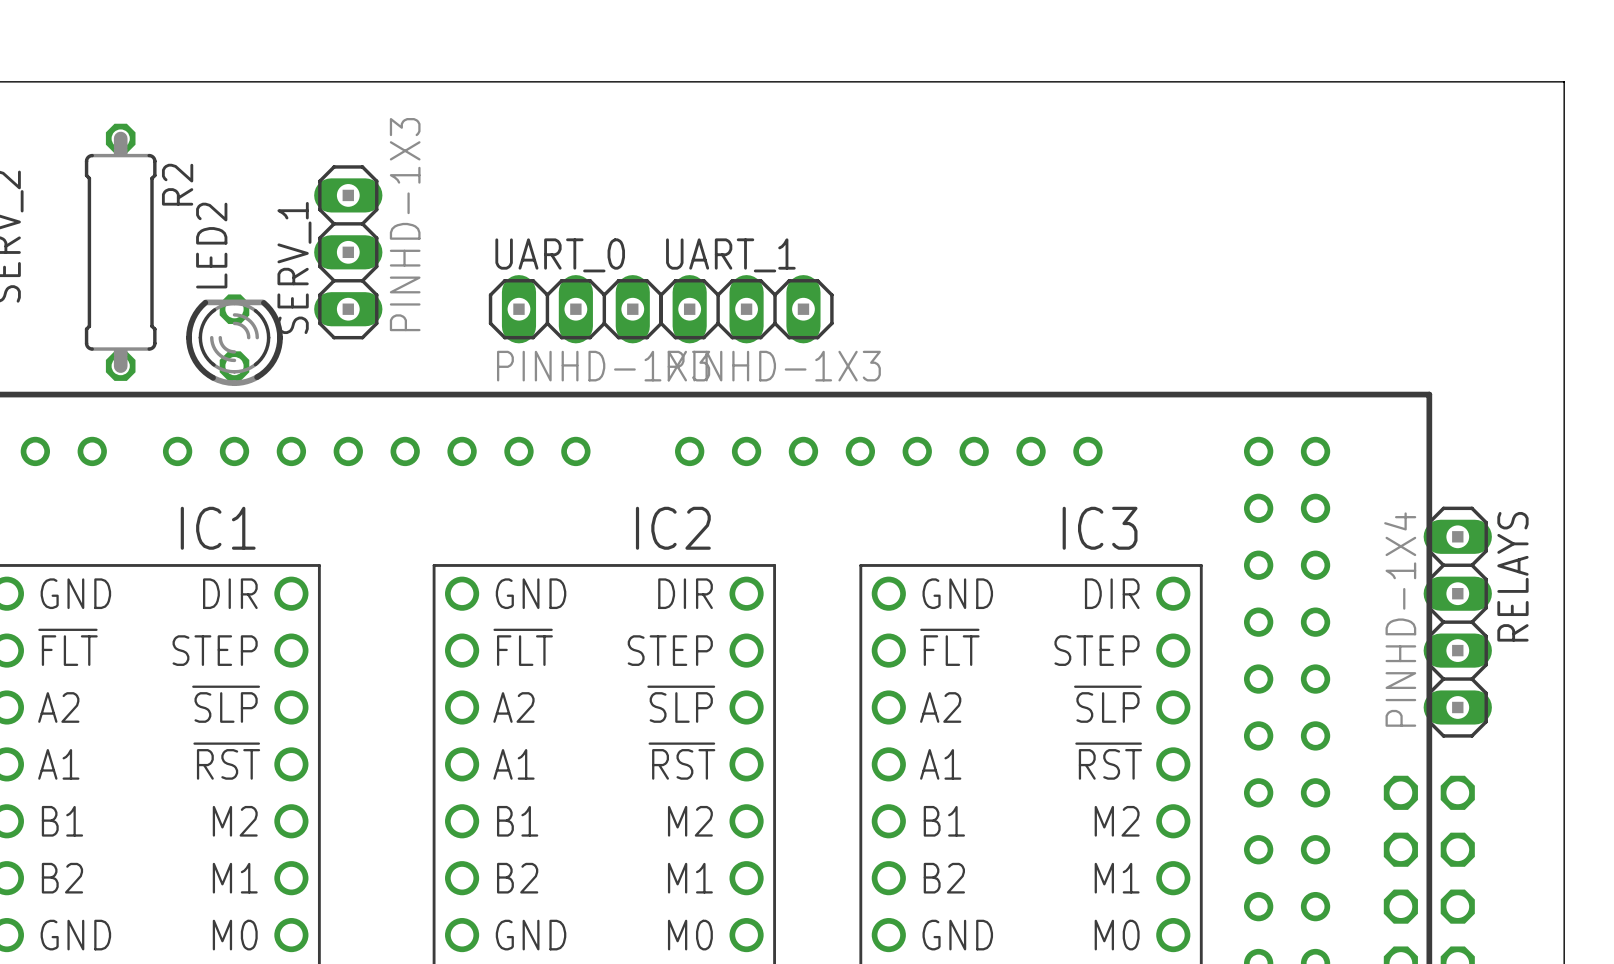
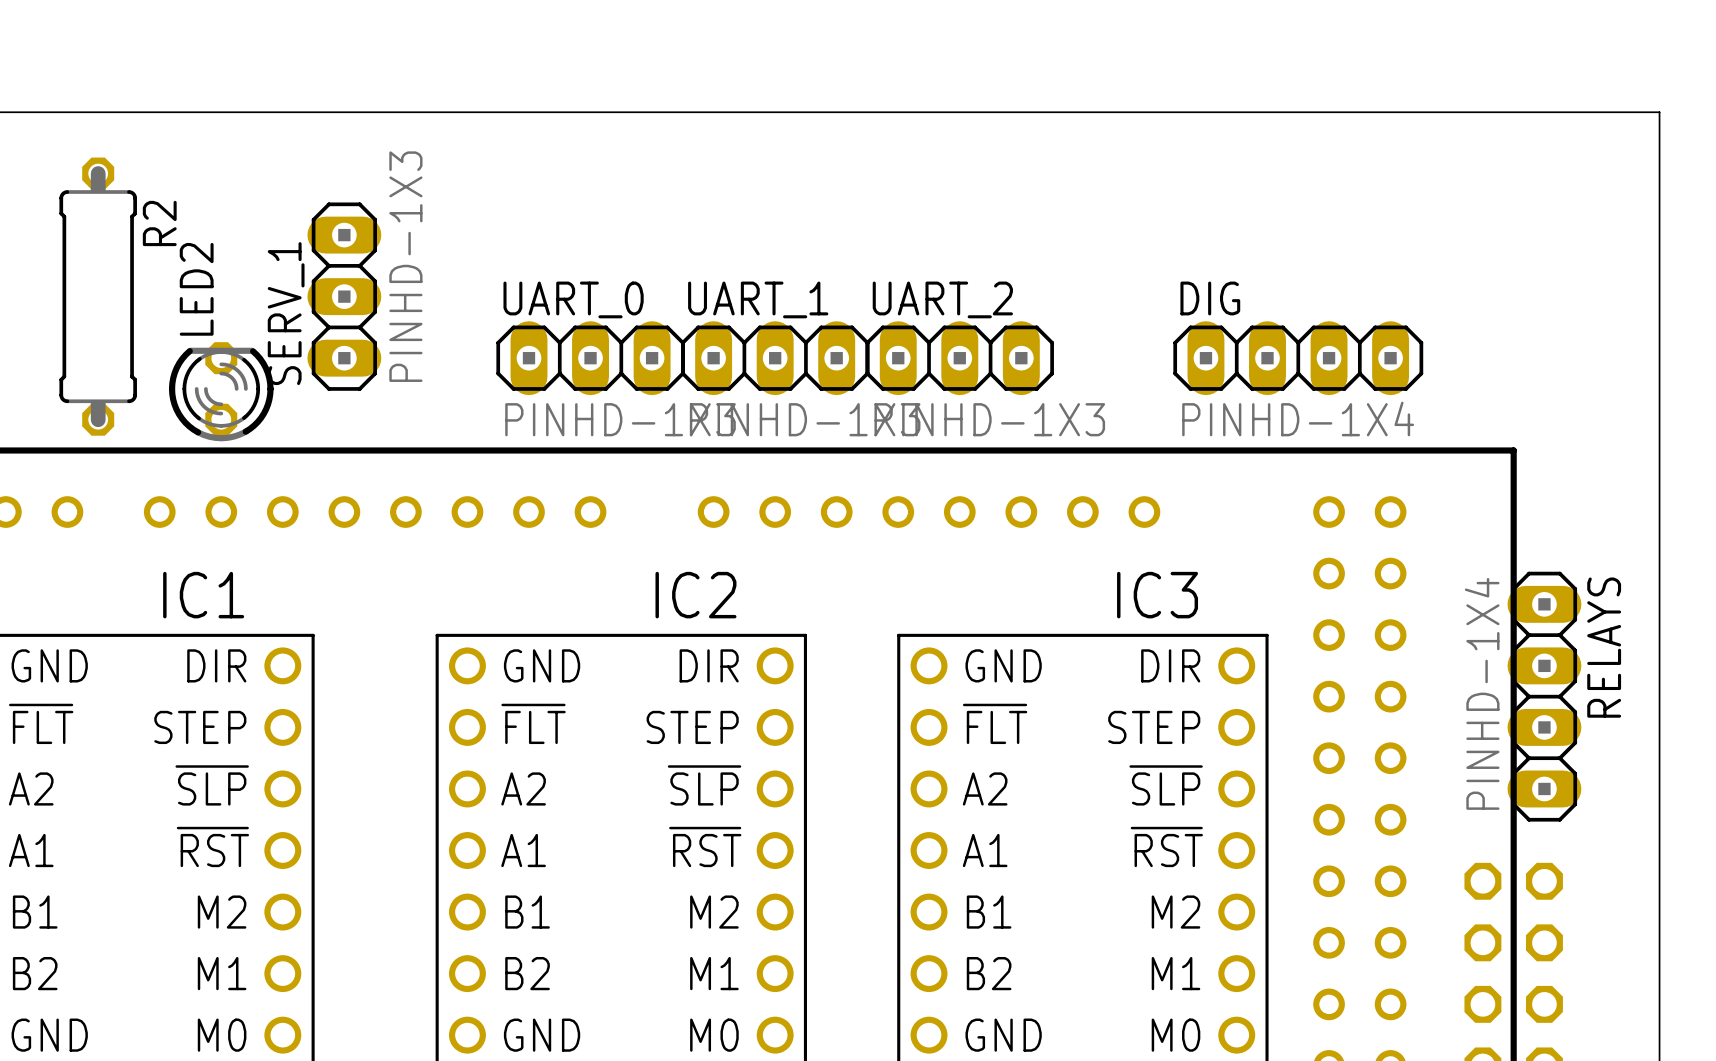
UART_2: none -> PINHD-1X3 (959, 358)
DIG: none -> PINHD-1X4 (1298, 358)

